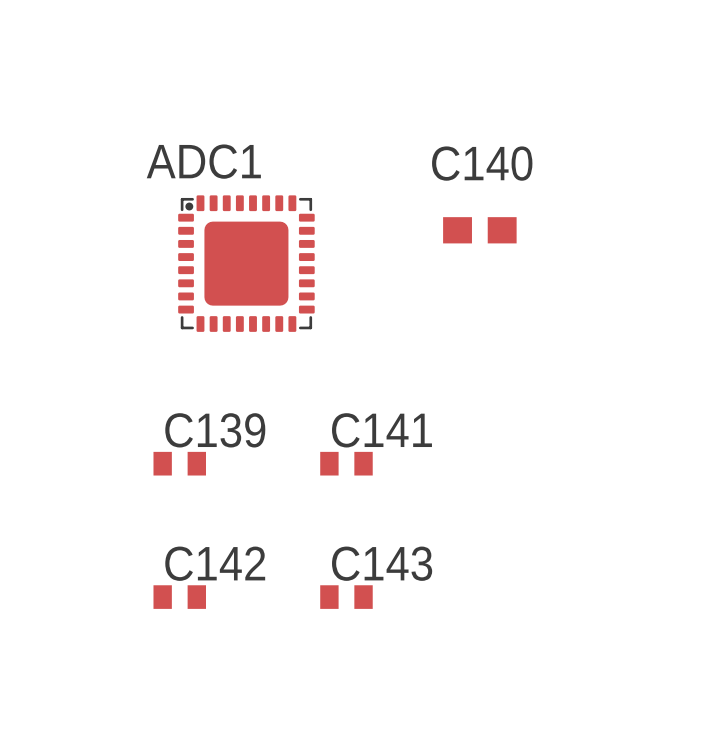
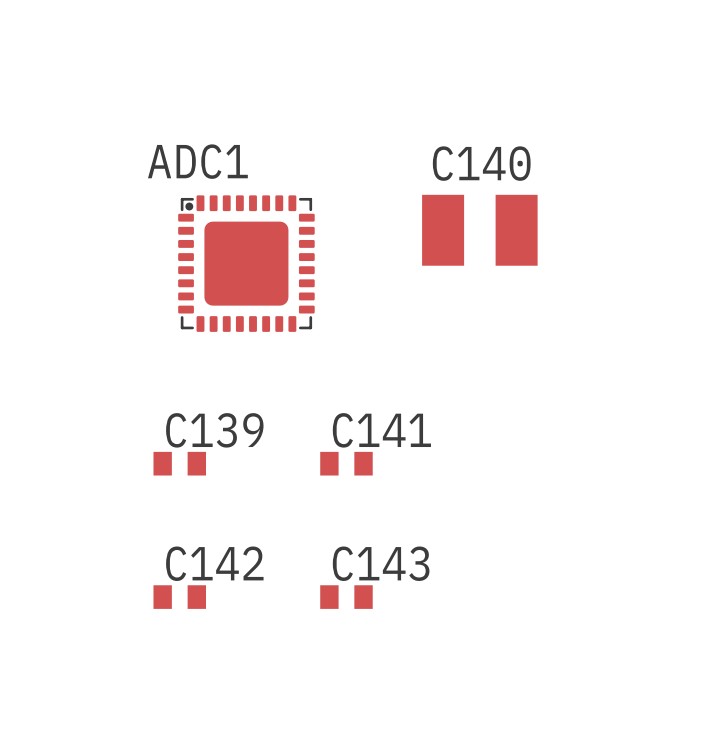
C140 footprint: [443, 217, 517, 244] -> [422, 194, 538, 266]

